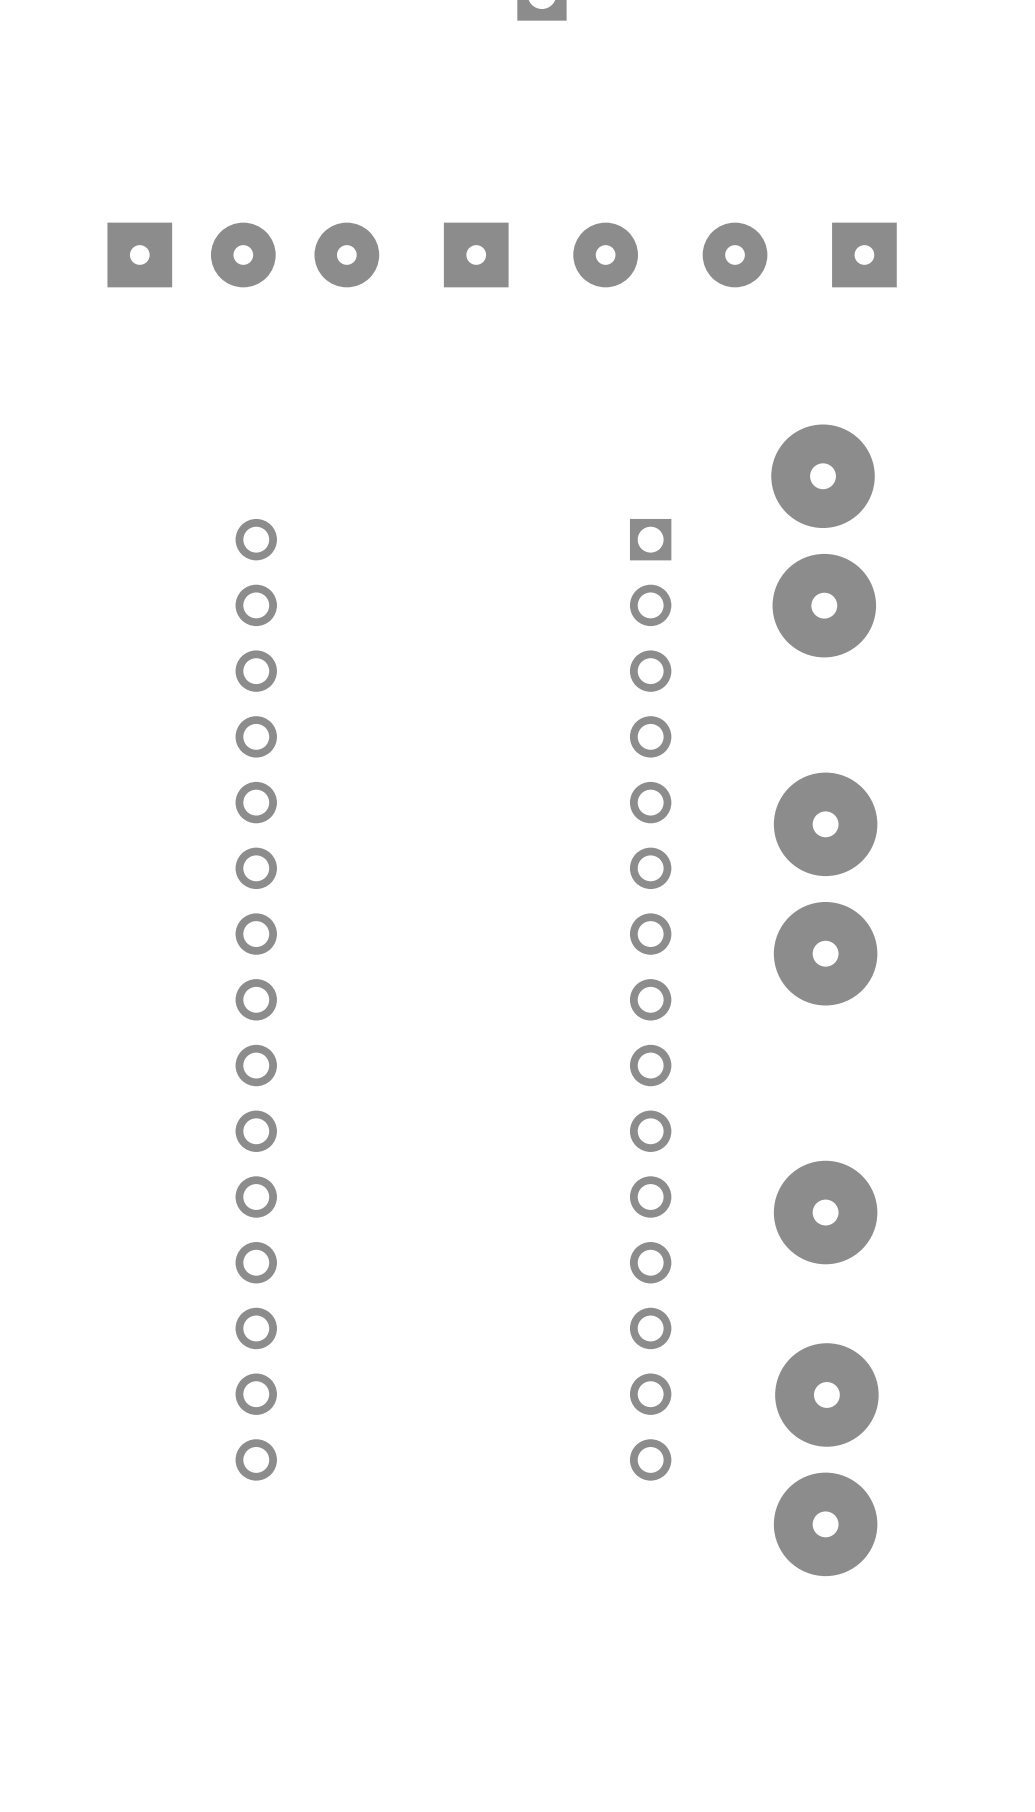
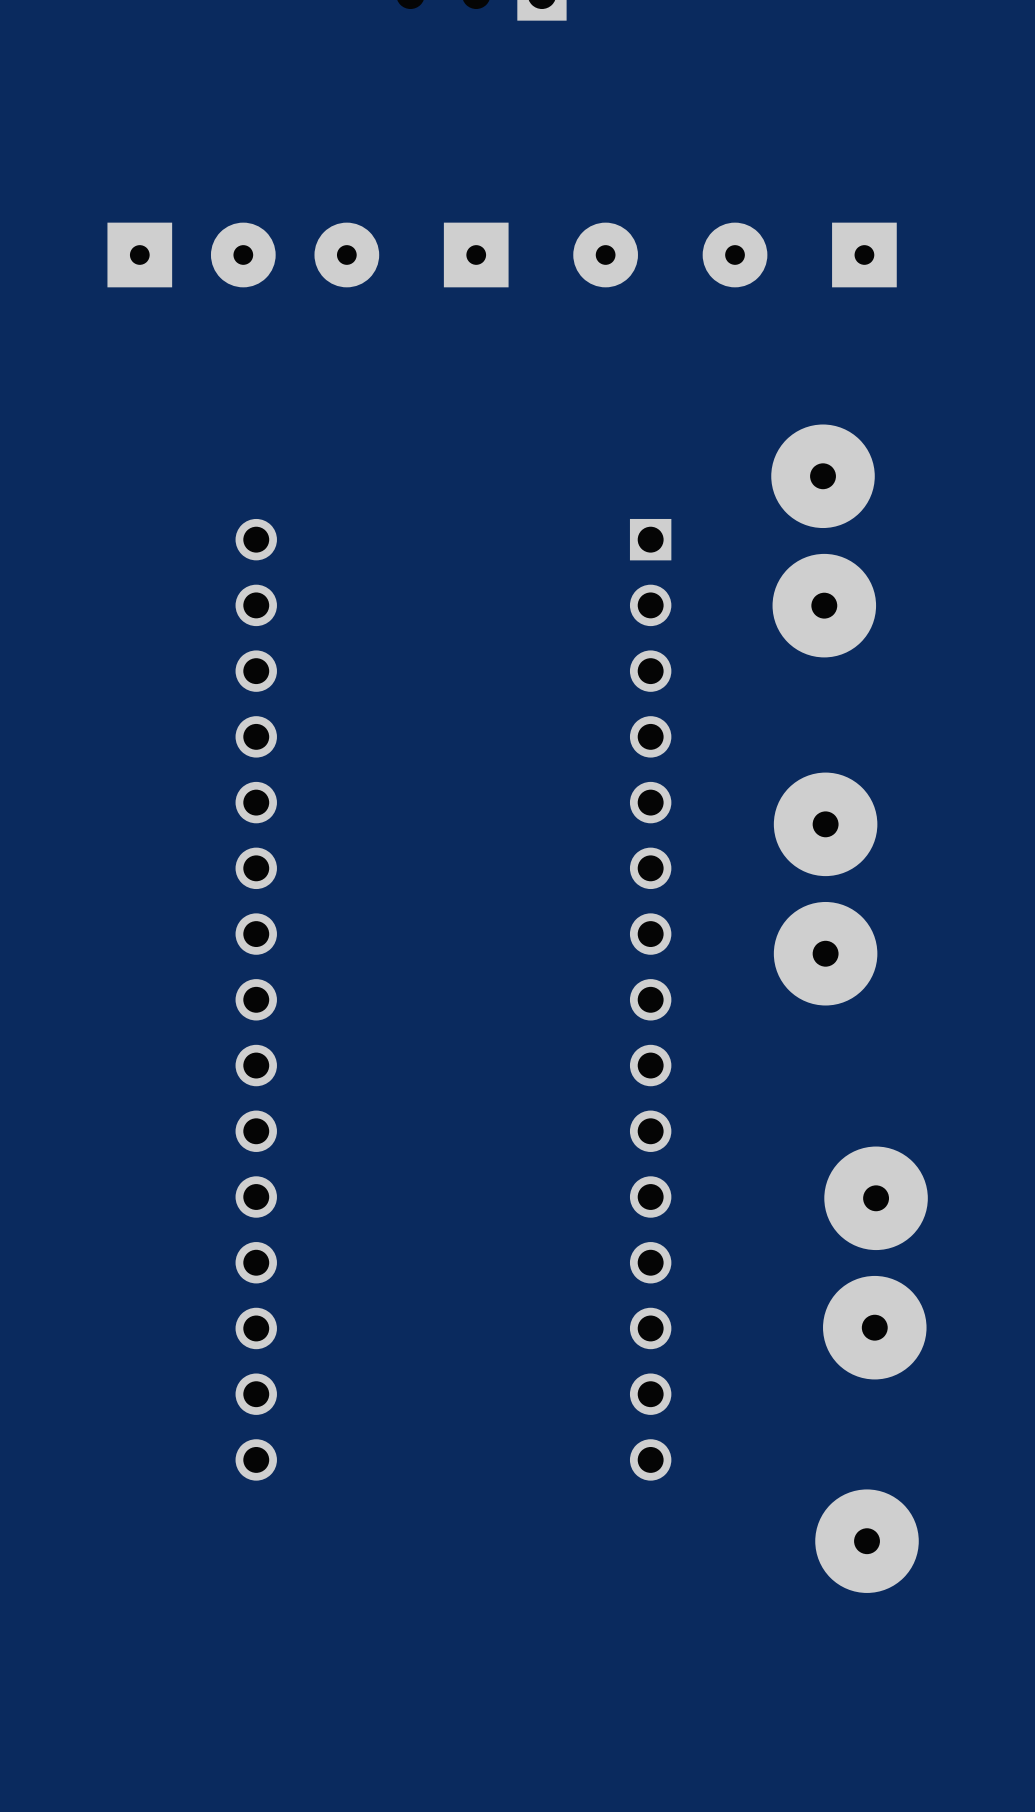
part position: (825, 1212) -> (876, 1198)
part: none -> (874, 1327)
part: (826, 1394) -> none
part position: (825, 1524) -> (867, 1541)

